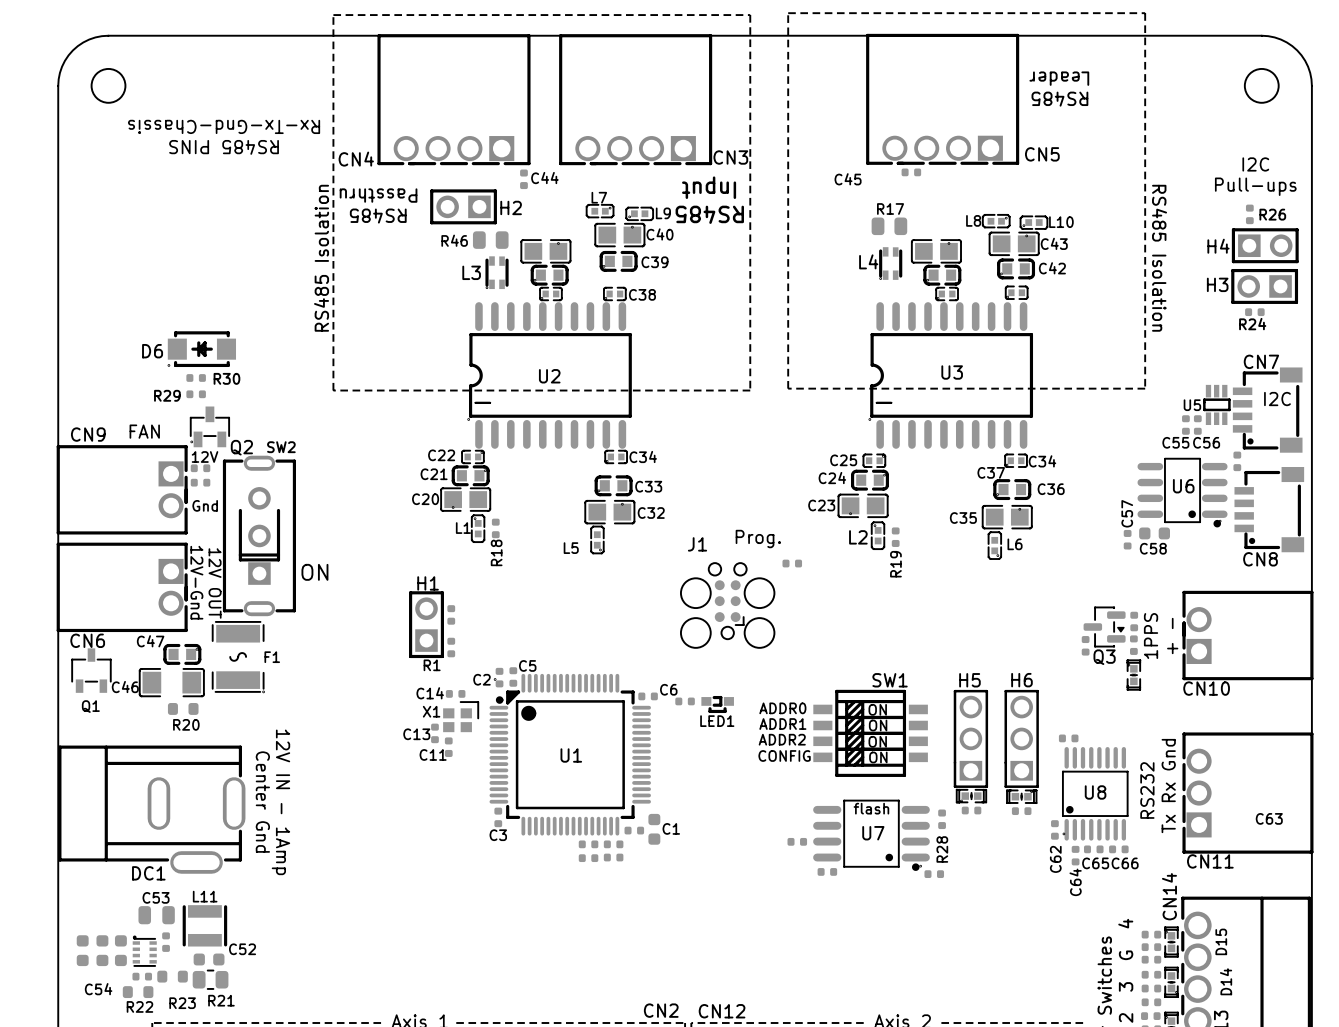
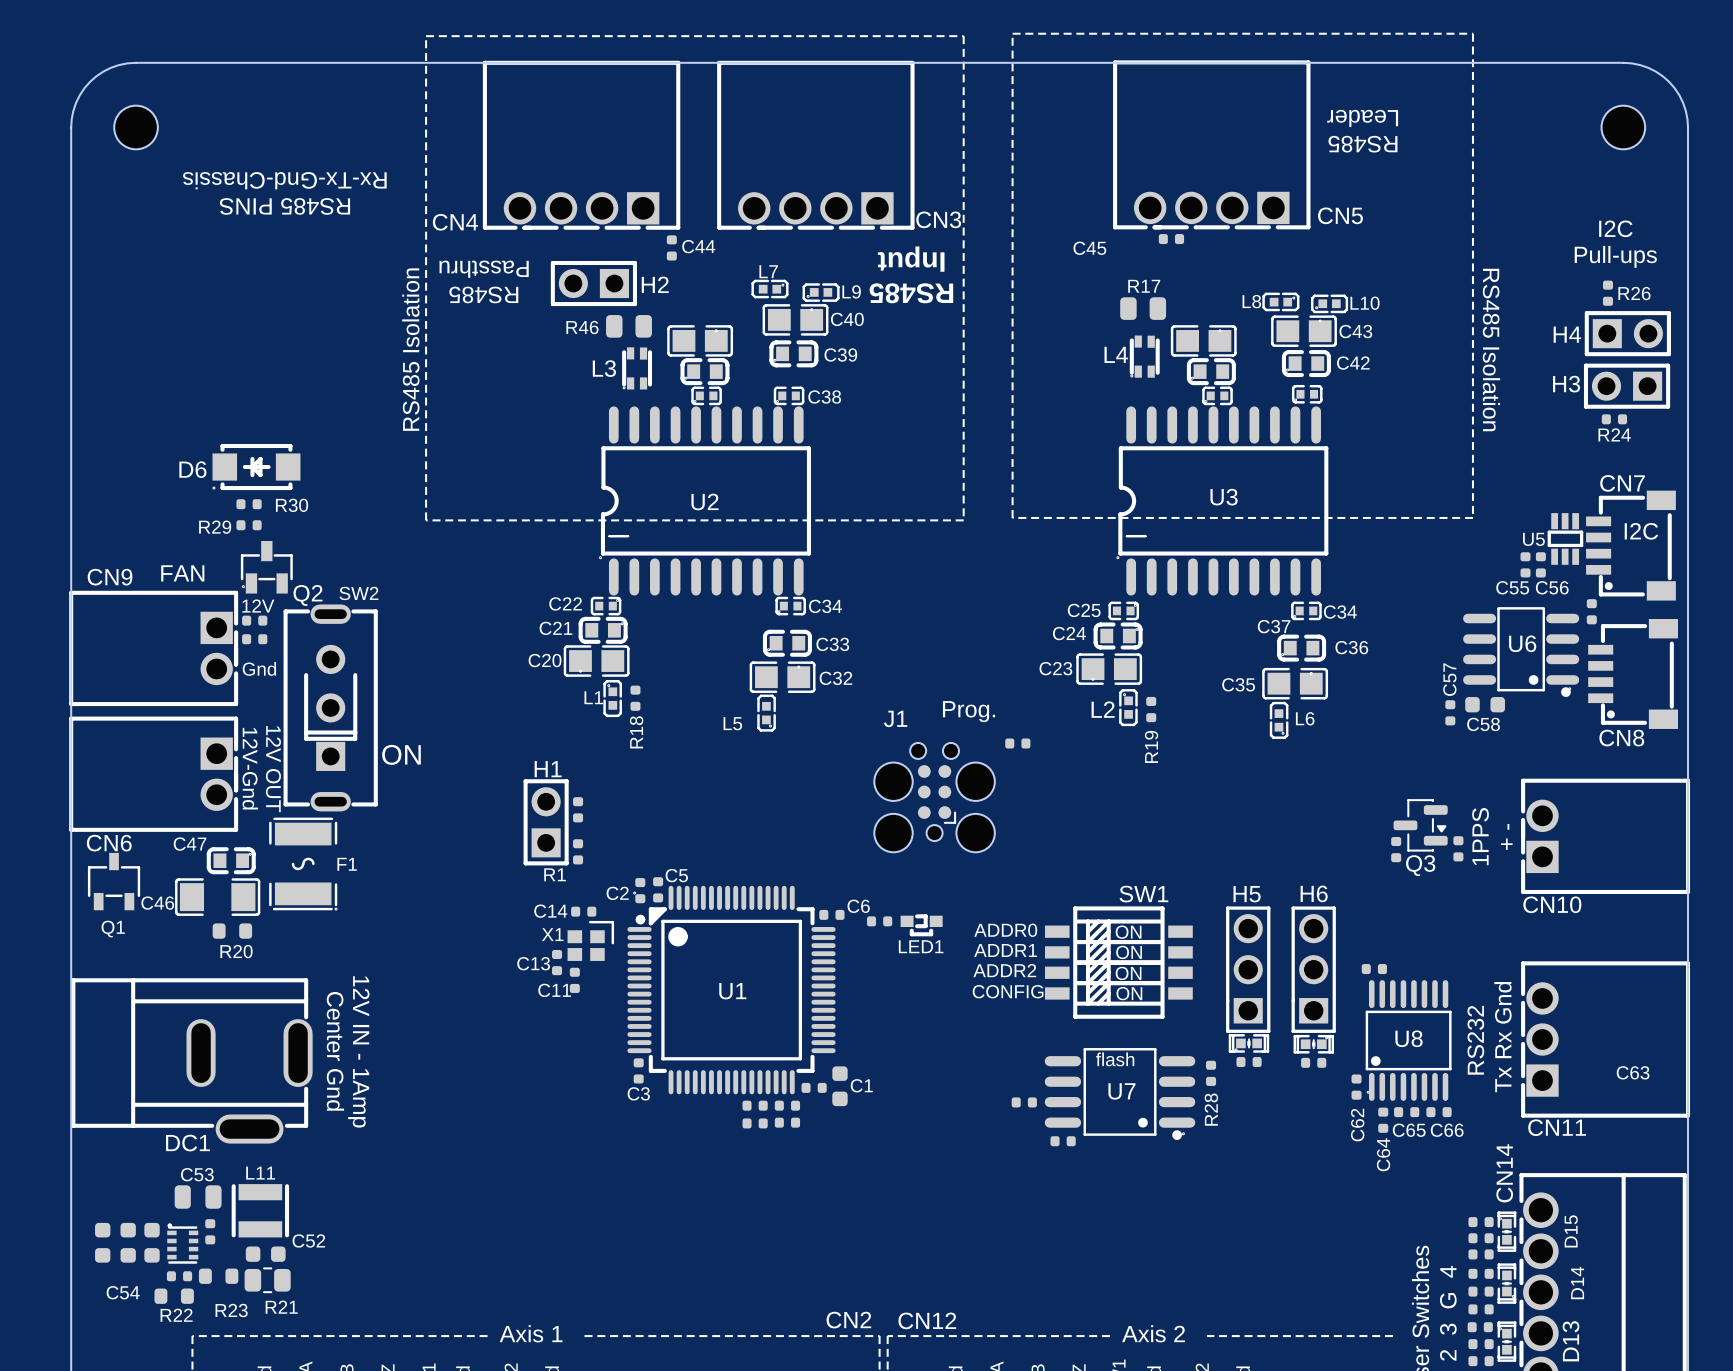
part: (1134, 621) -> none
part: (1133, 675) -> none
part: (934, 874) -> none

